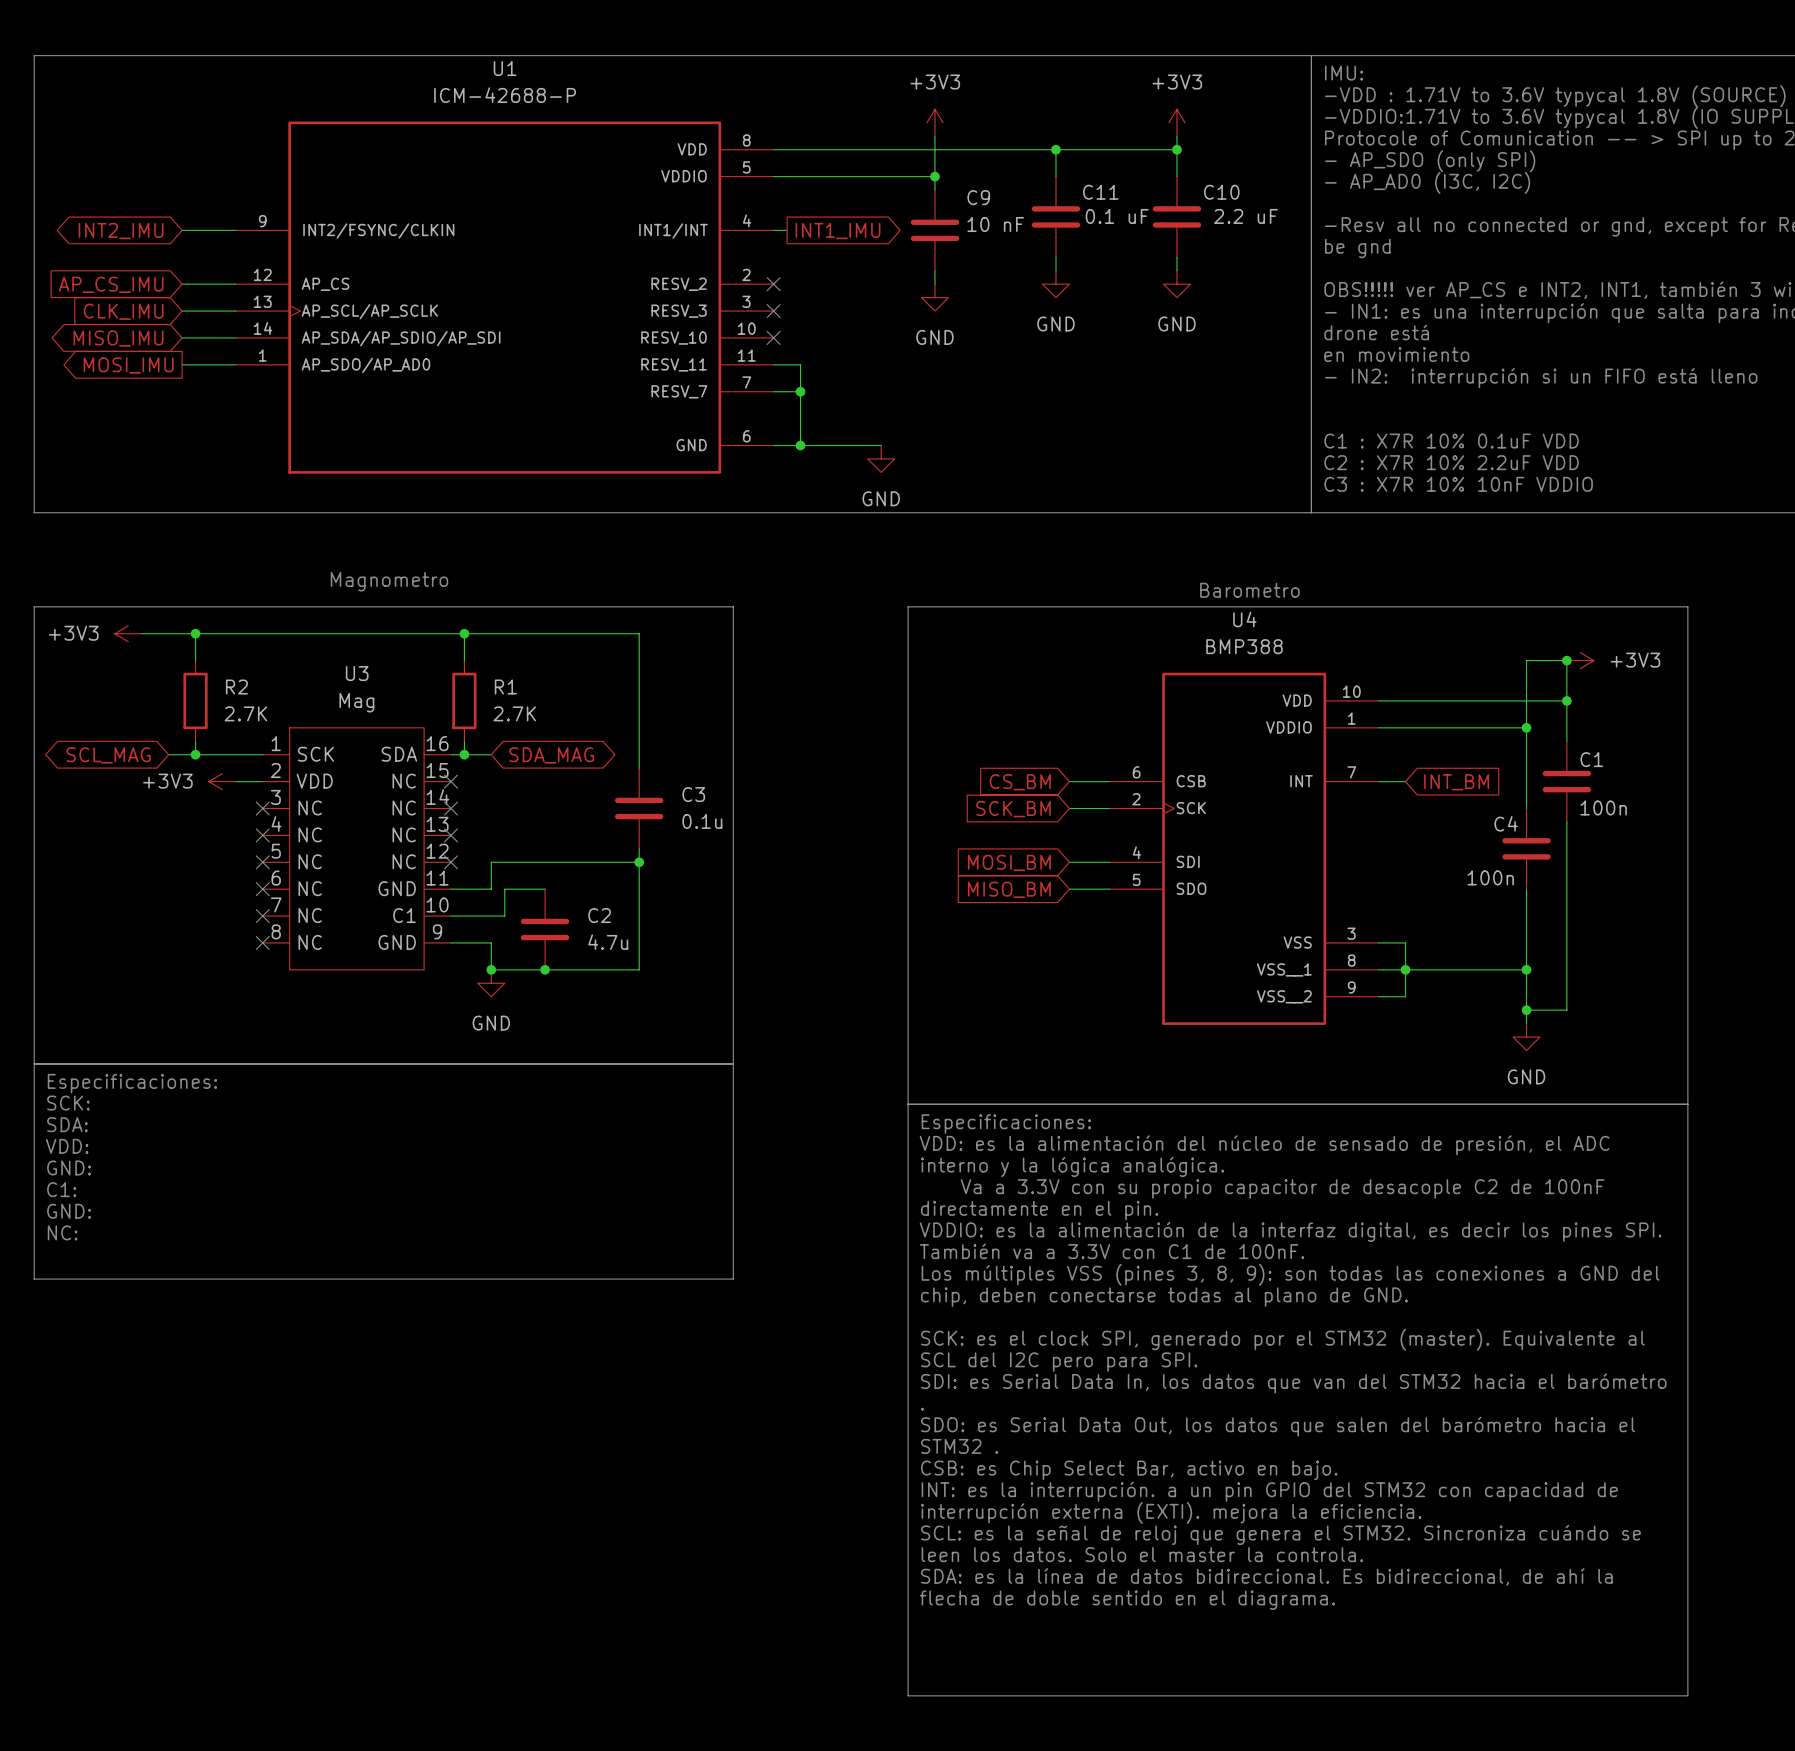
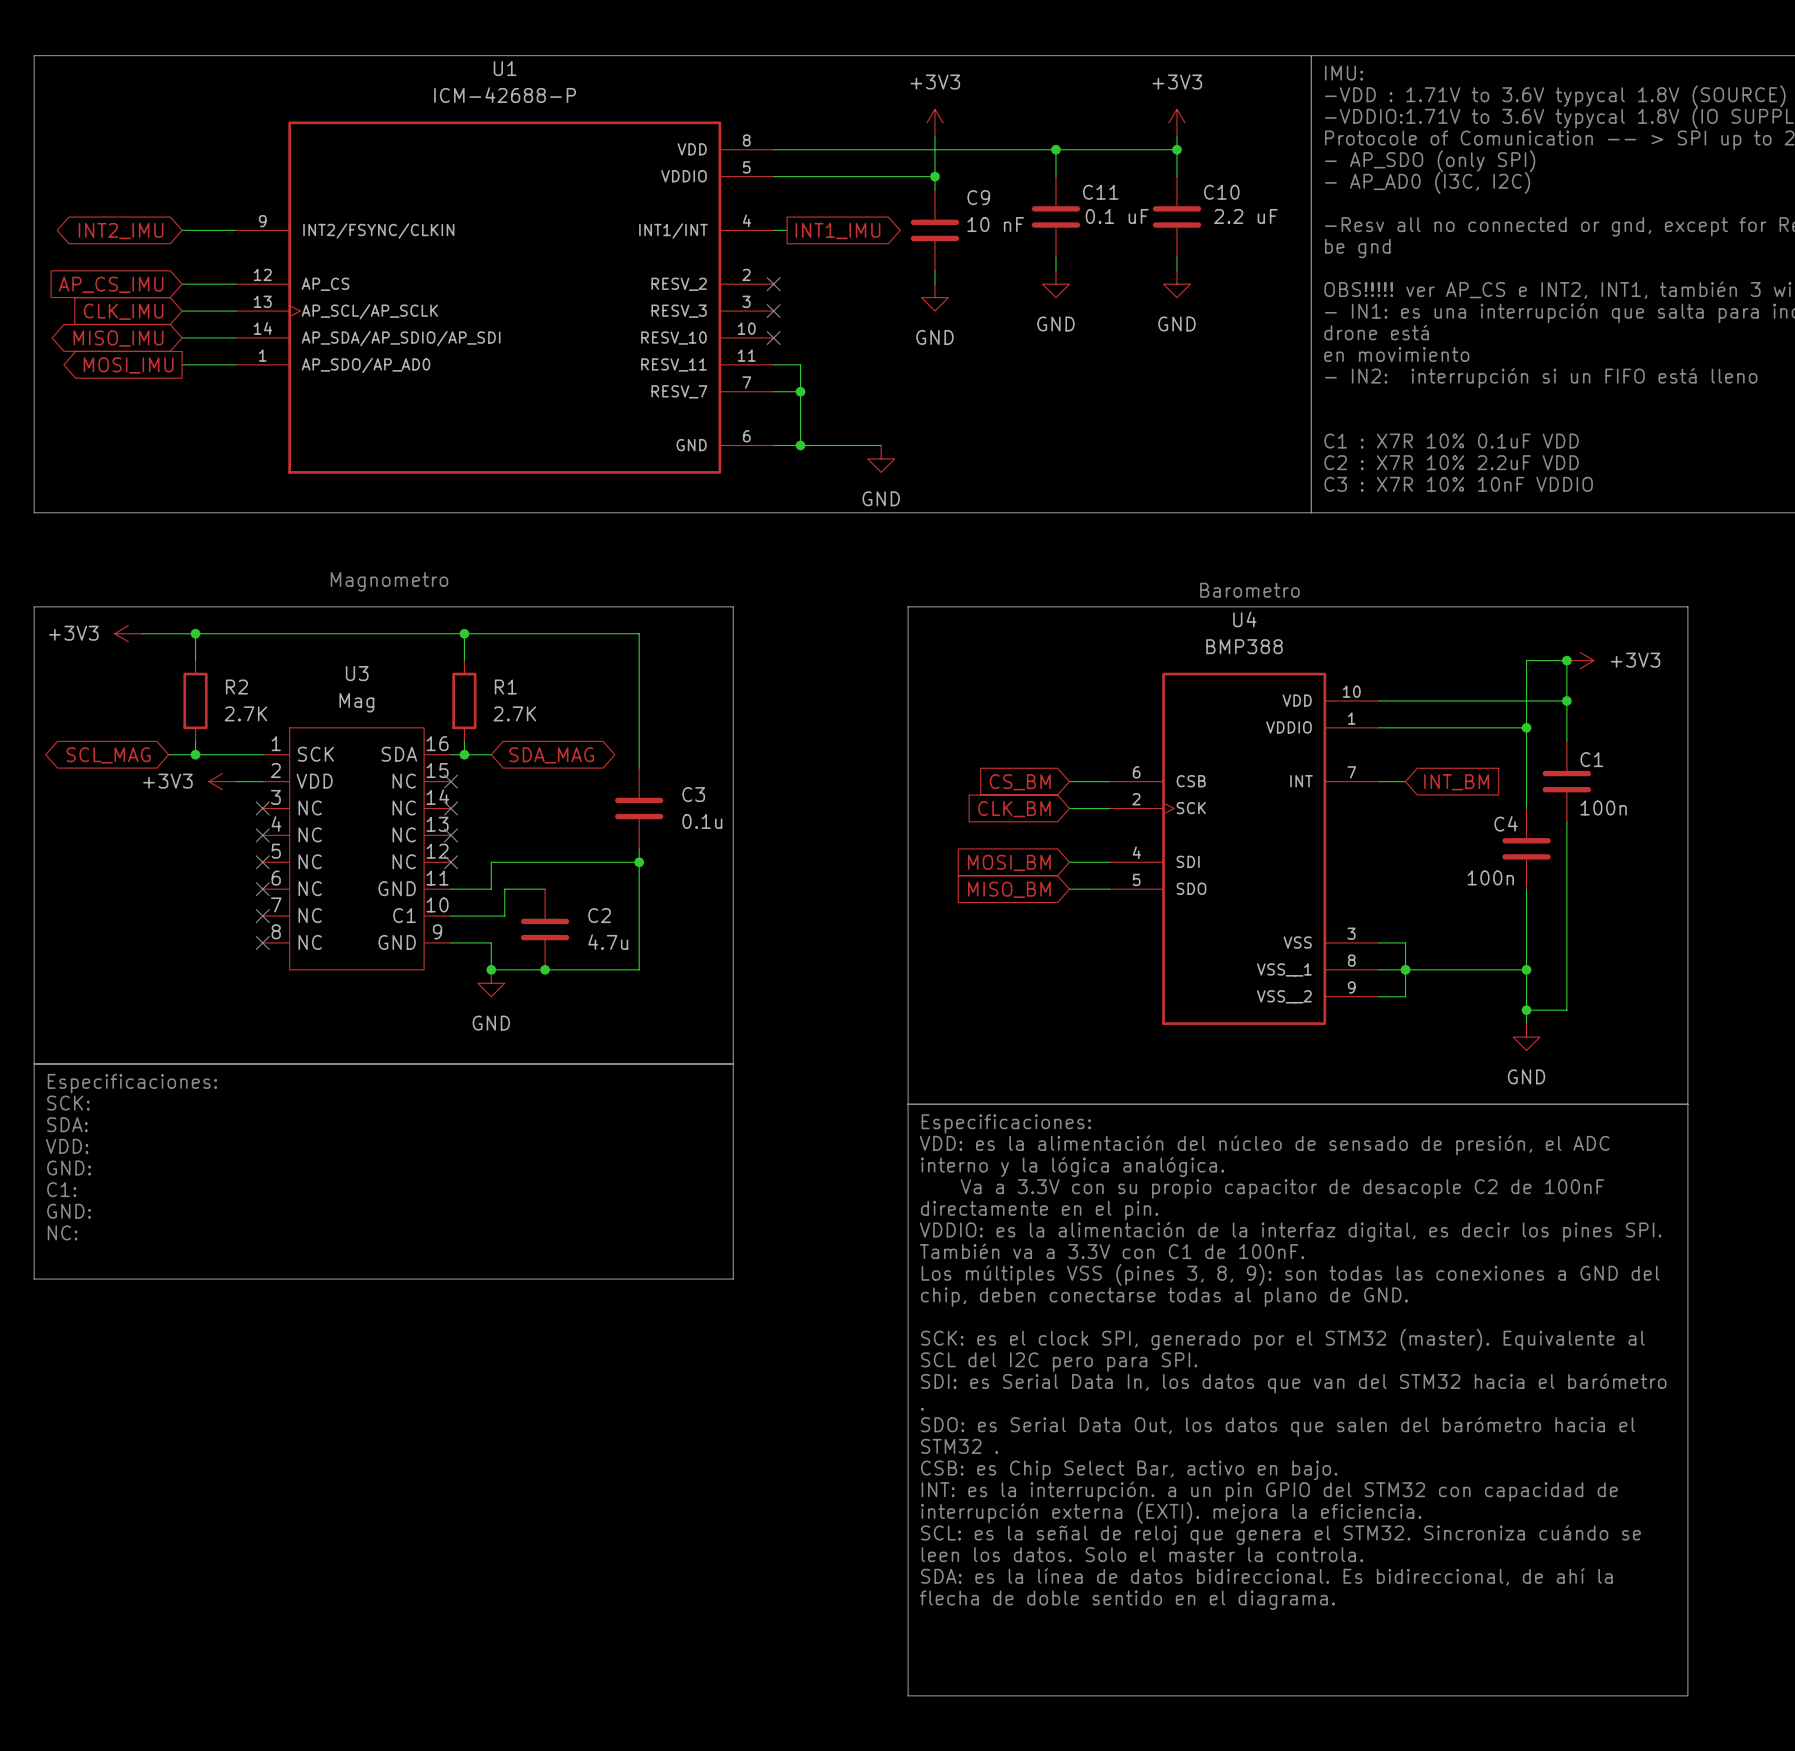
global label: SCK_BM (1013, 809) -> CLK_BM (1014, 809)

